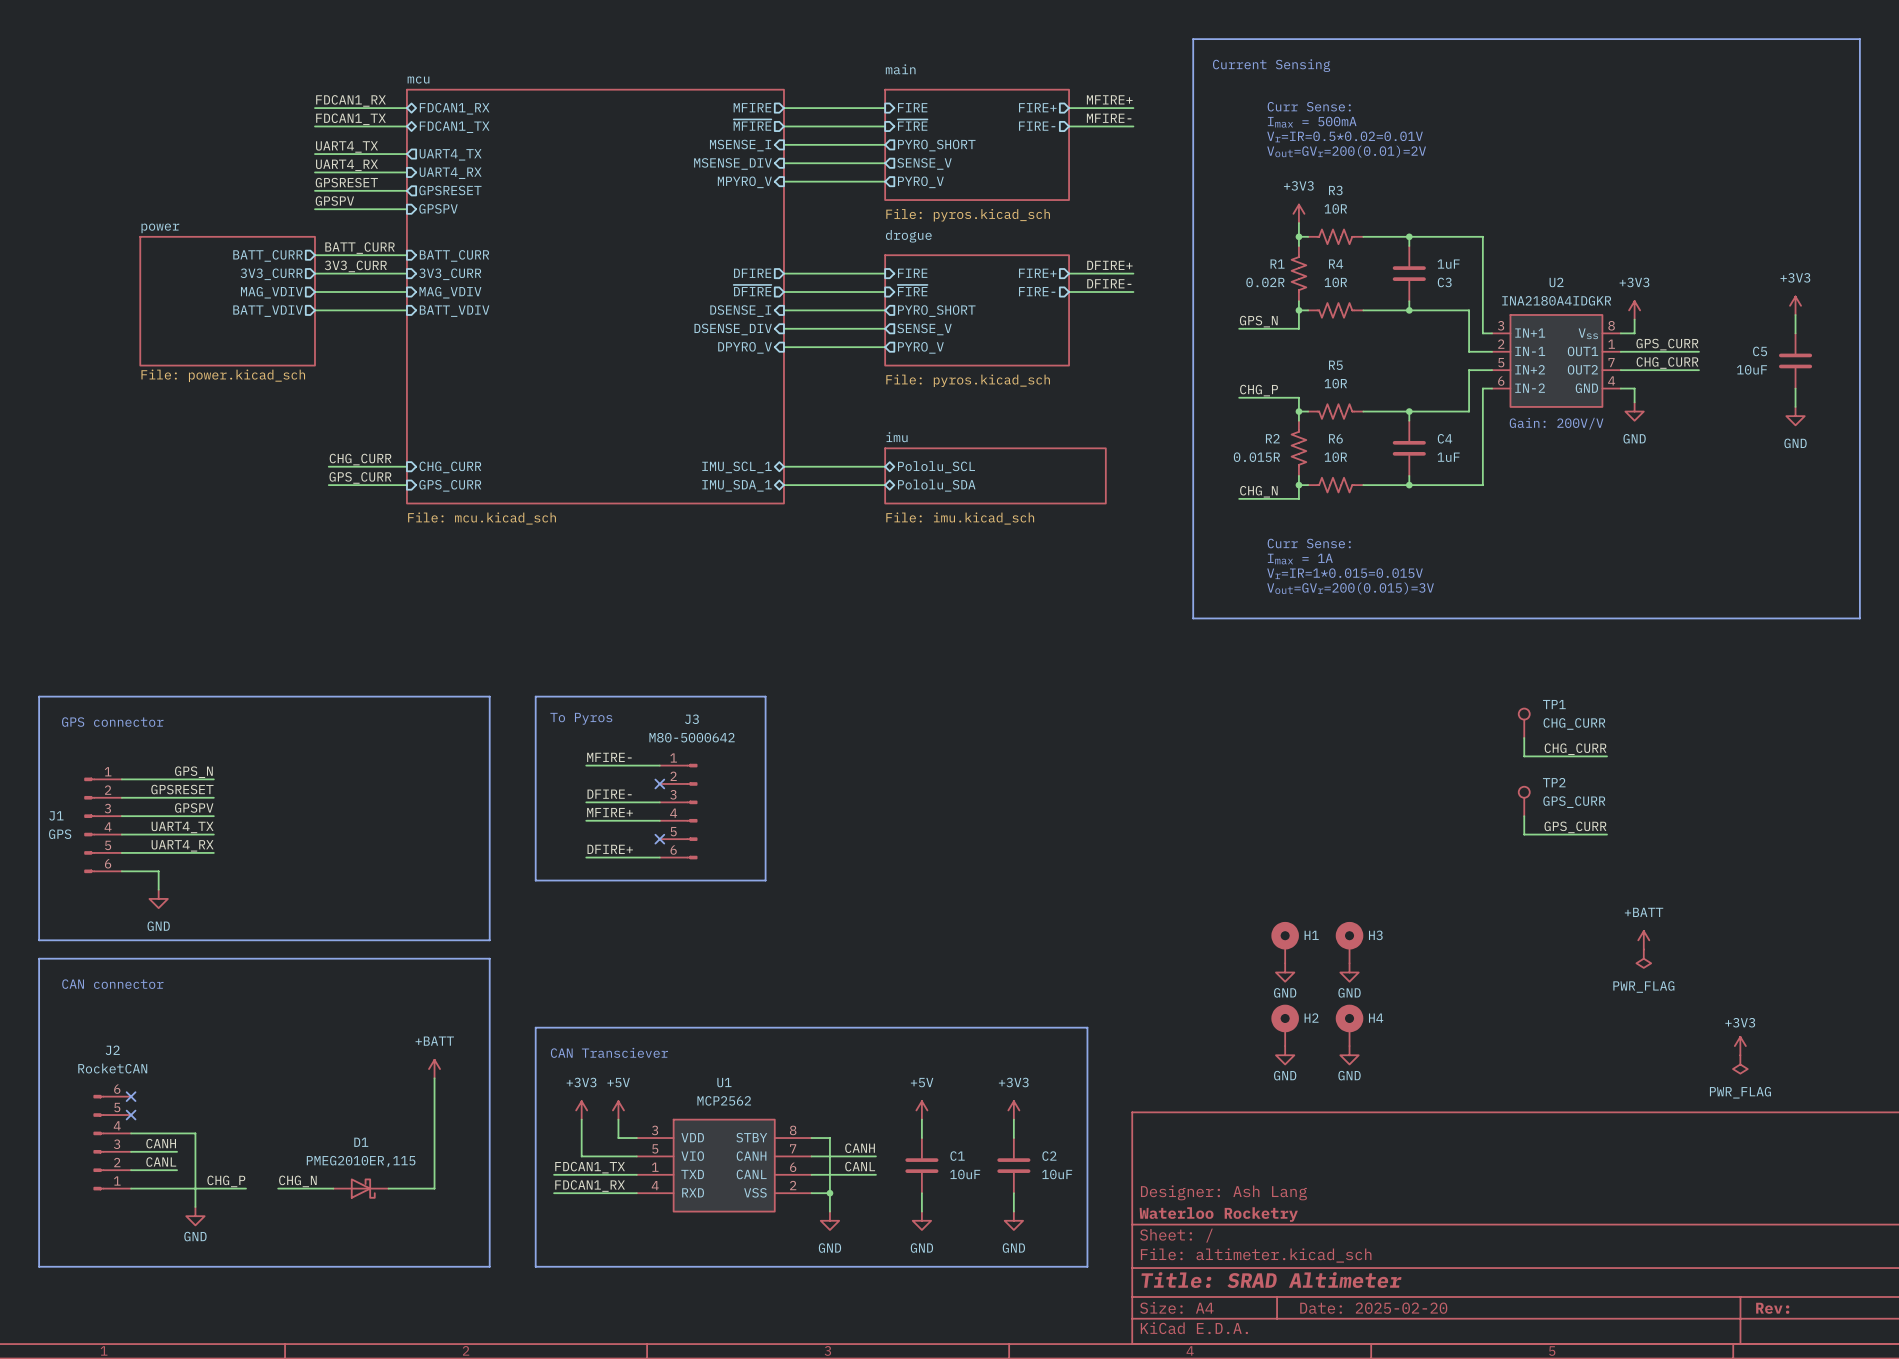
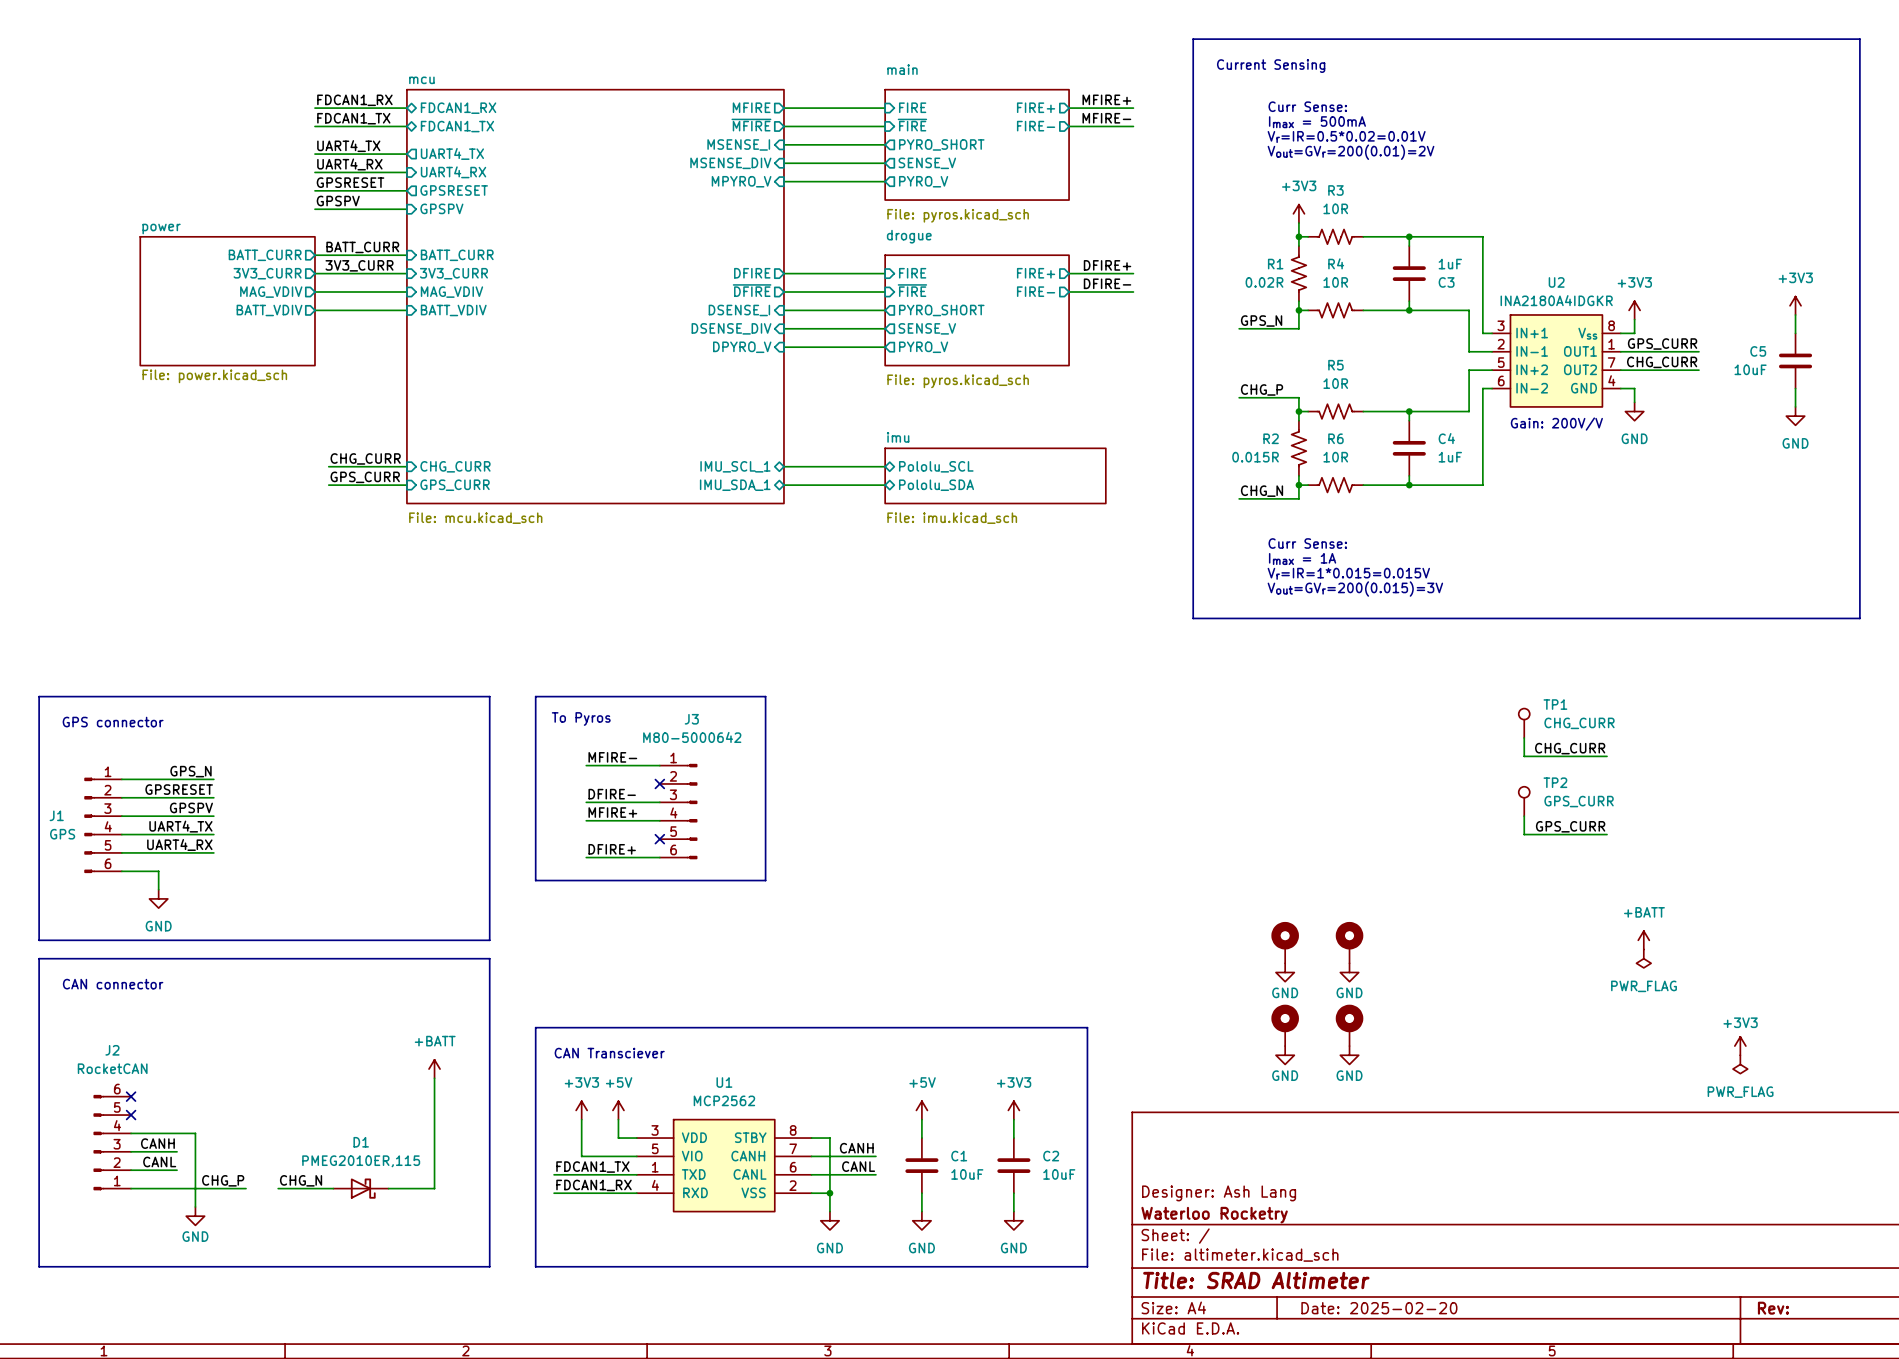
H1 name: H1 (1311, 935) -> none
H3 name: H3 (1375, 935) -> none
H2 name: H2 (1311, 1018) -> none
H4 name: H4 (1376, 1018) -> none

